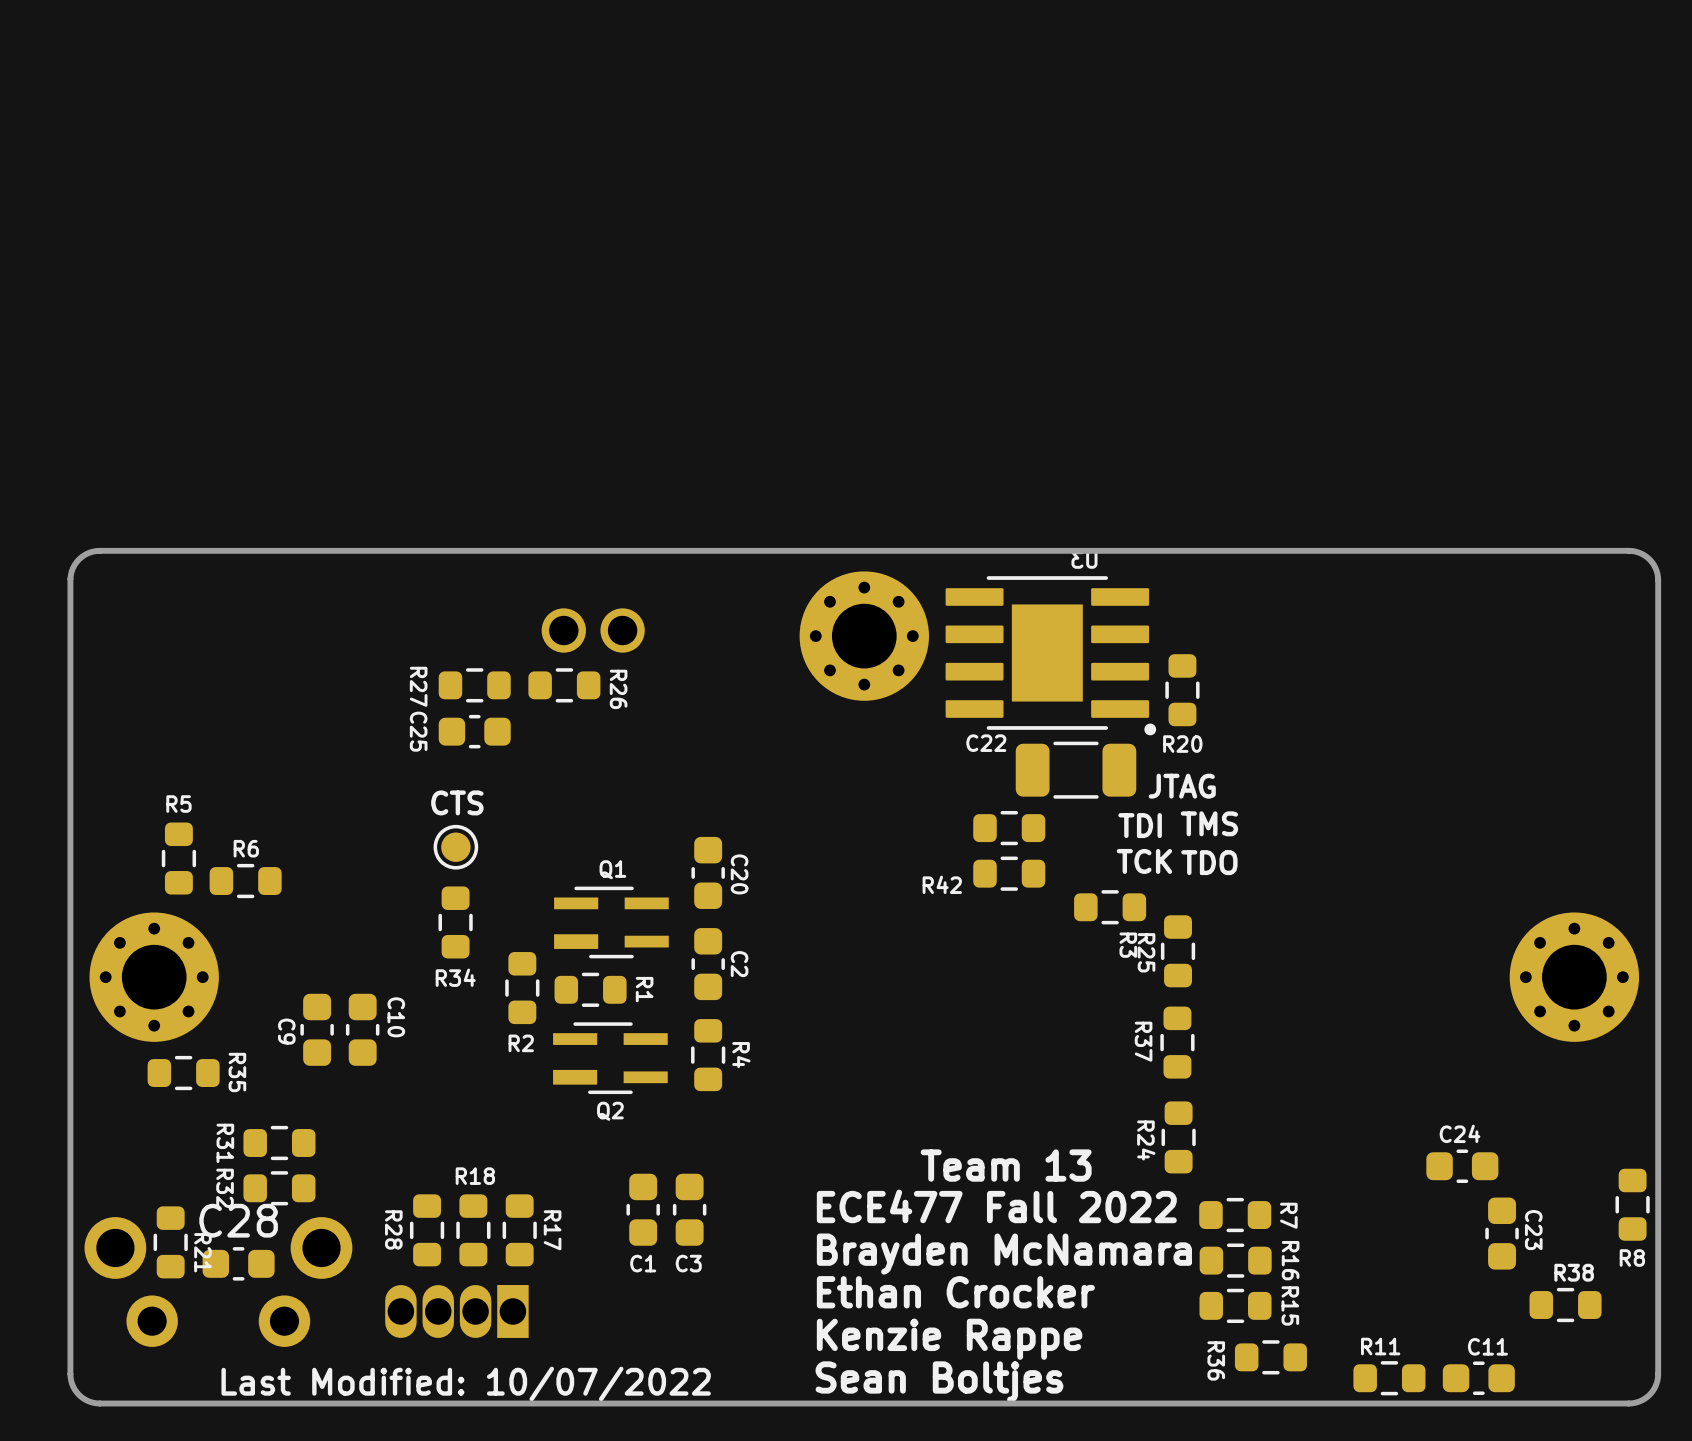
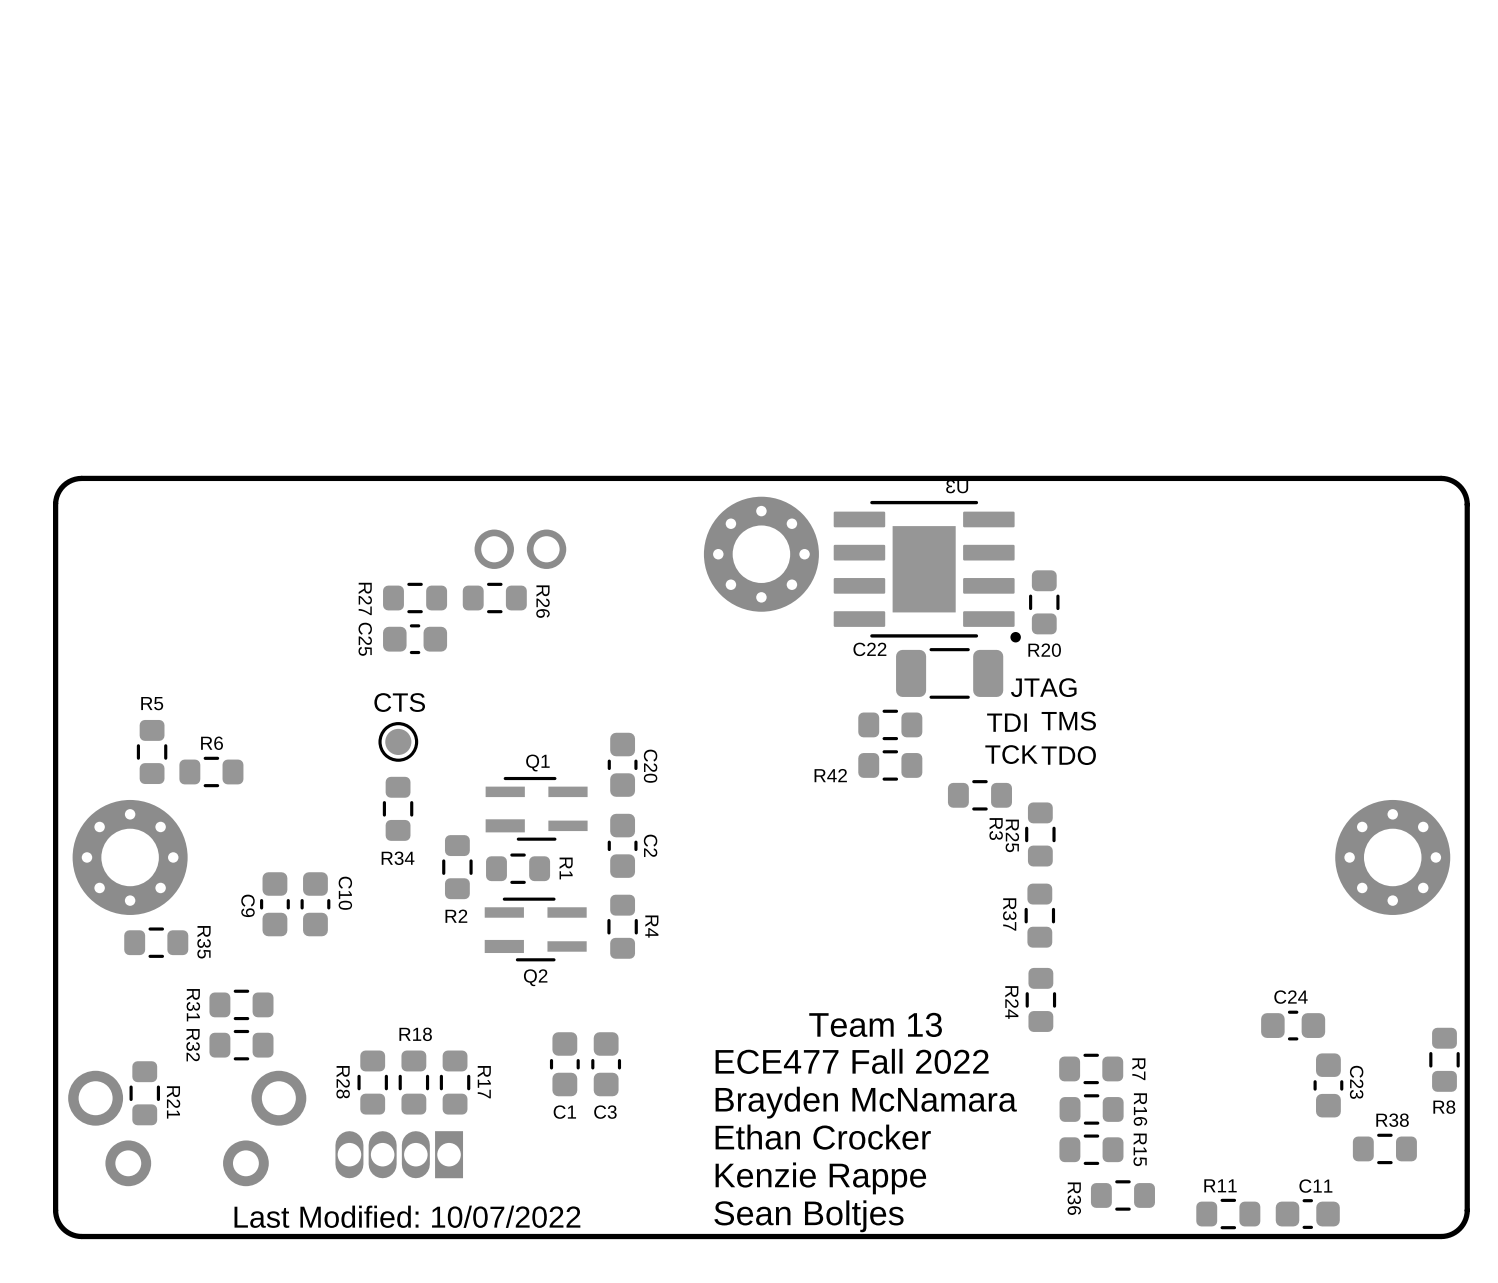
C28: (238, 1263) -> none

